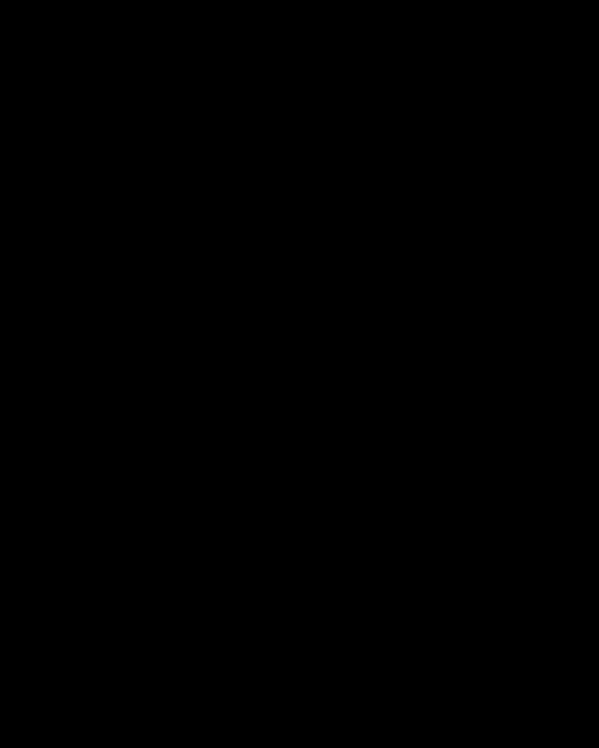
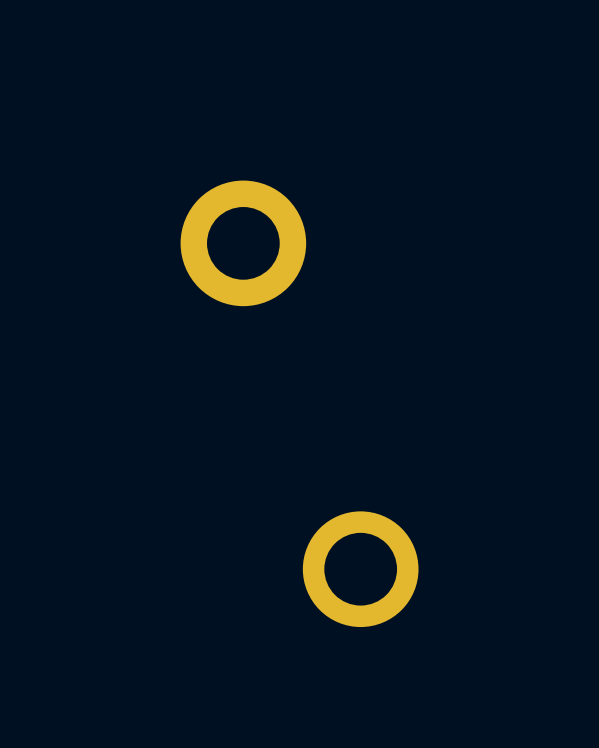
part: none -> (243, 243)
part: none -> (360, 569)

